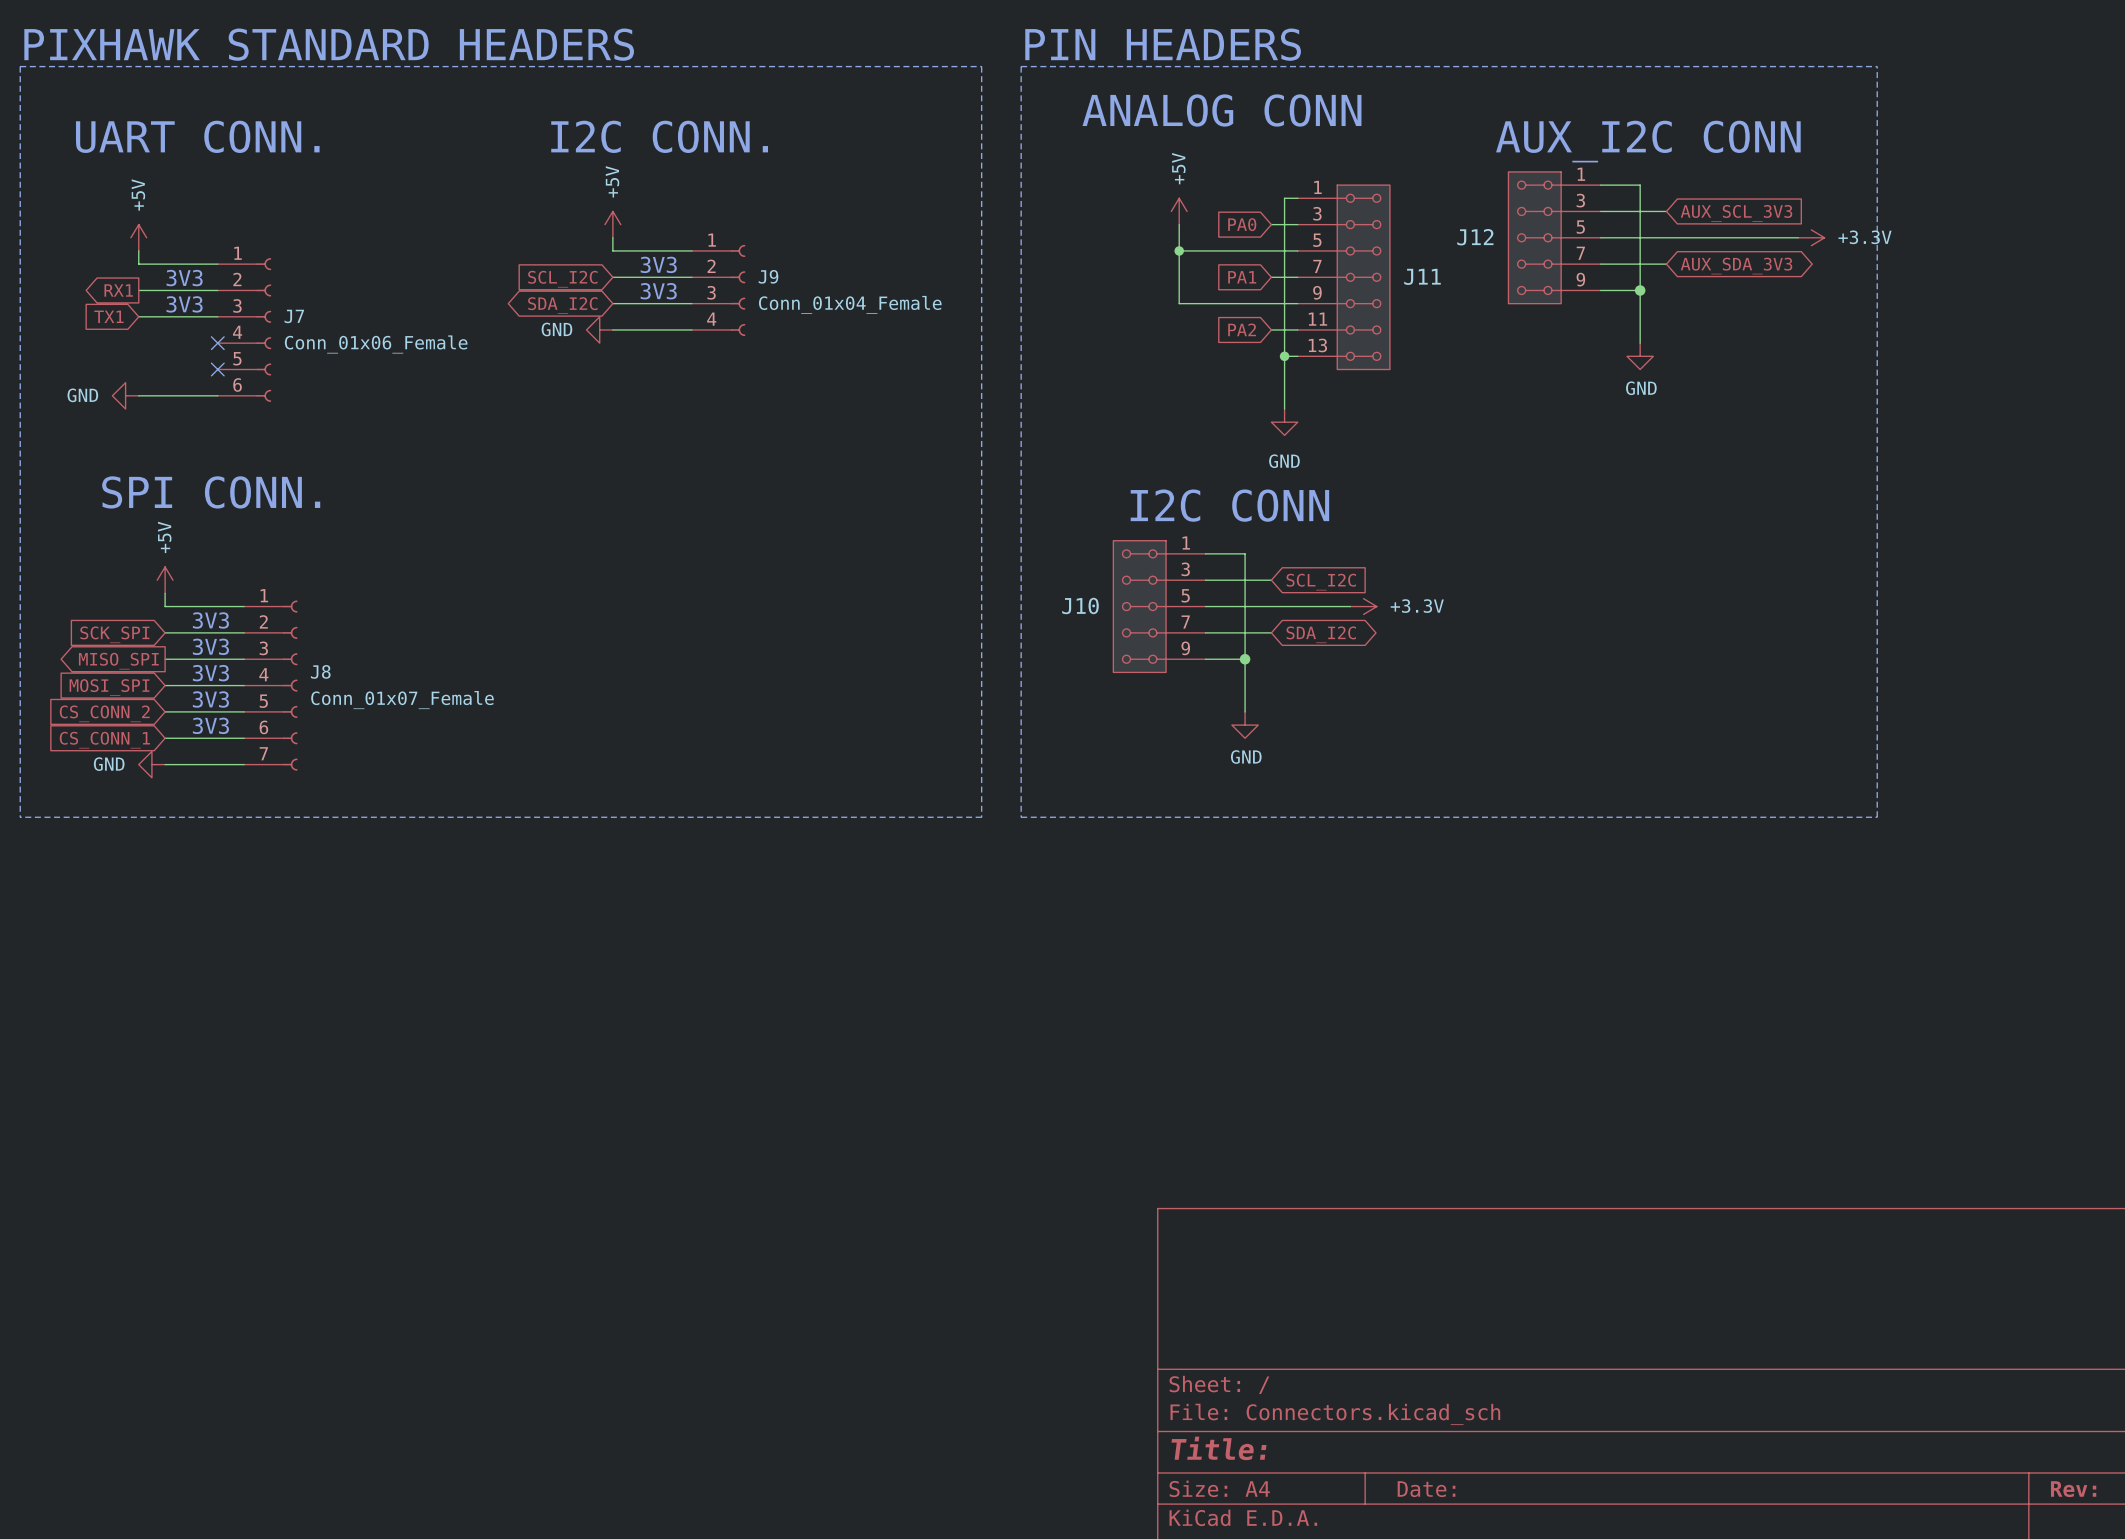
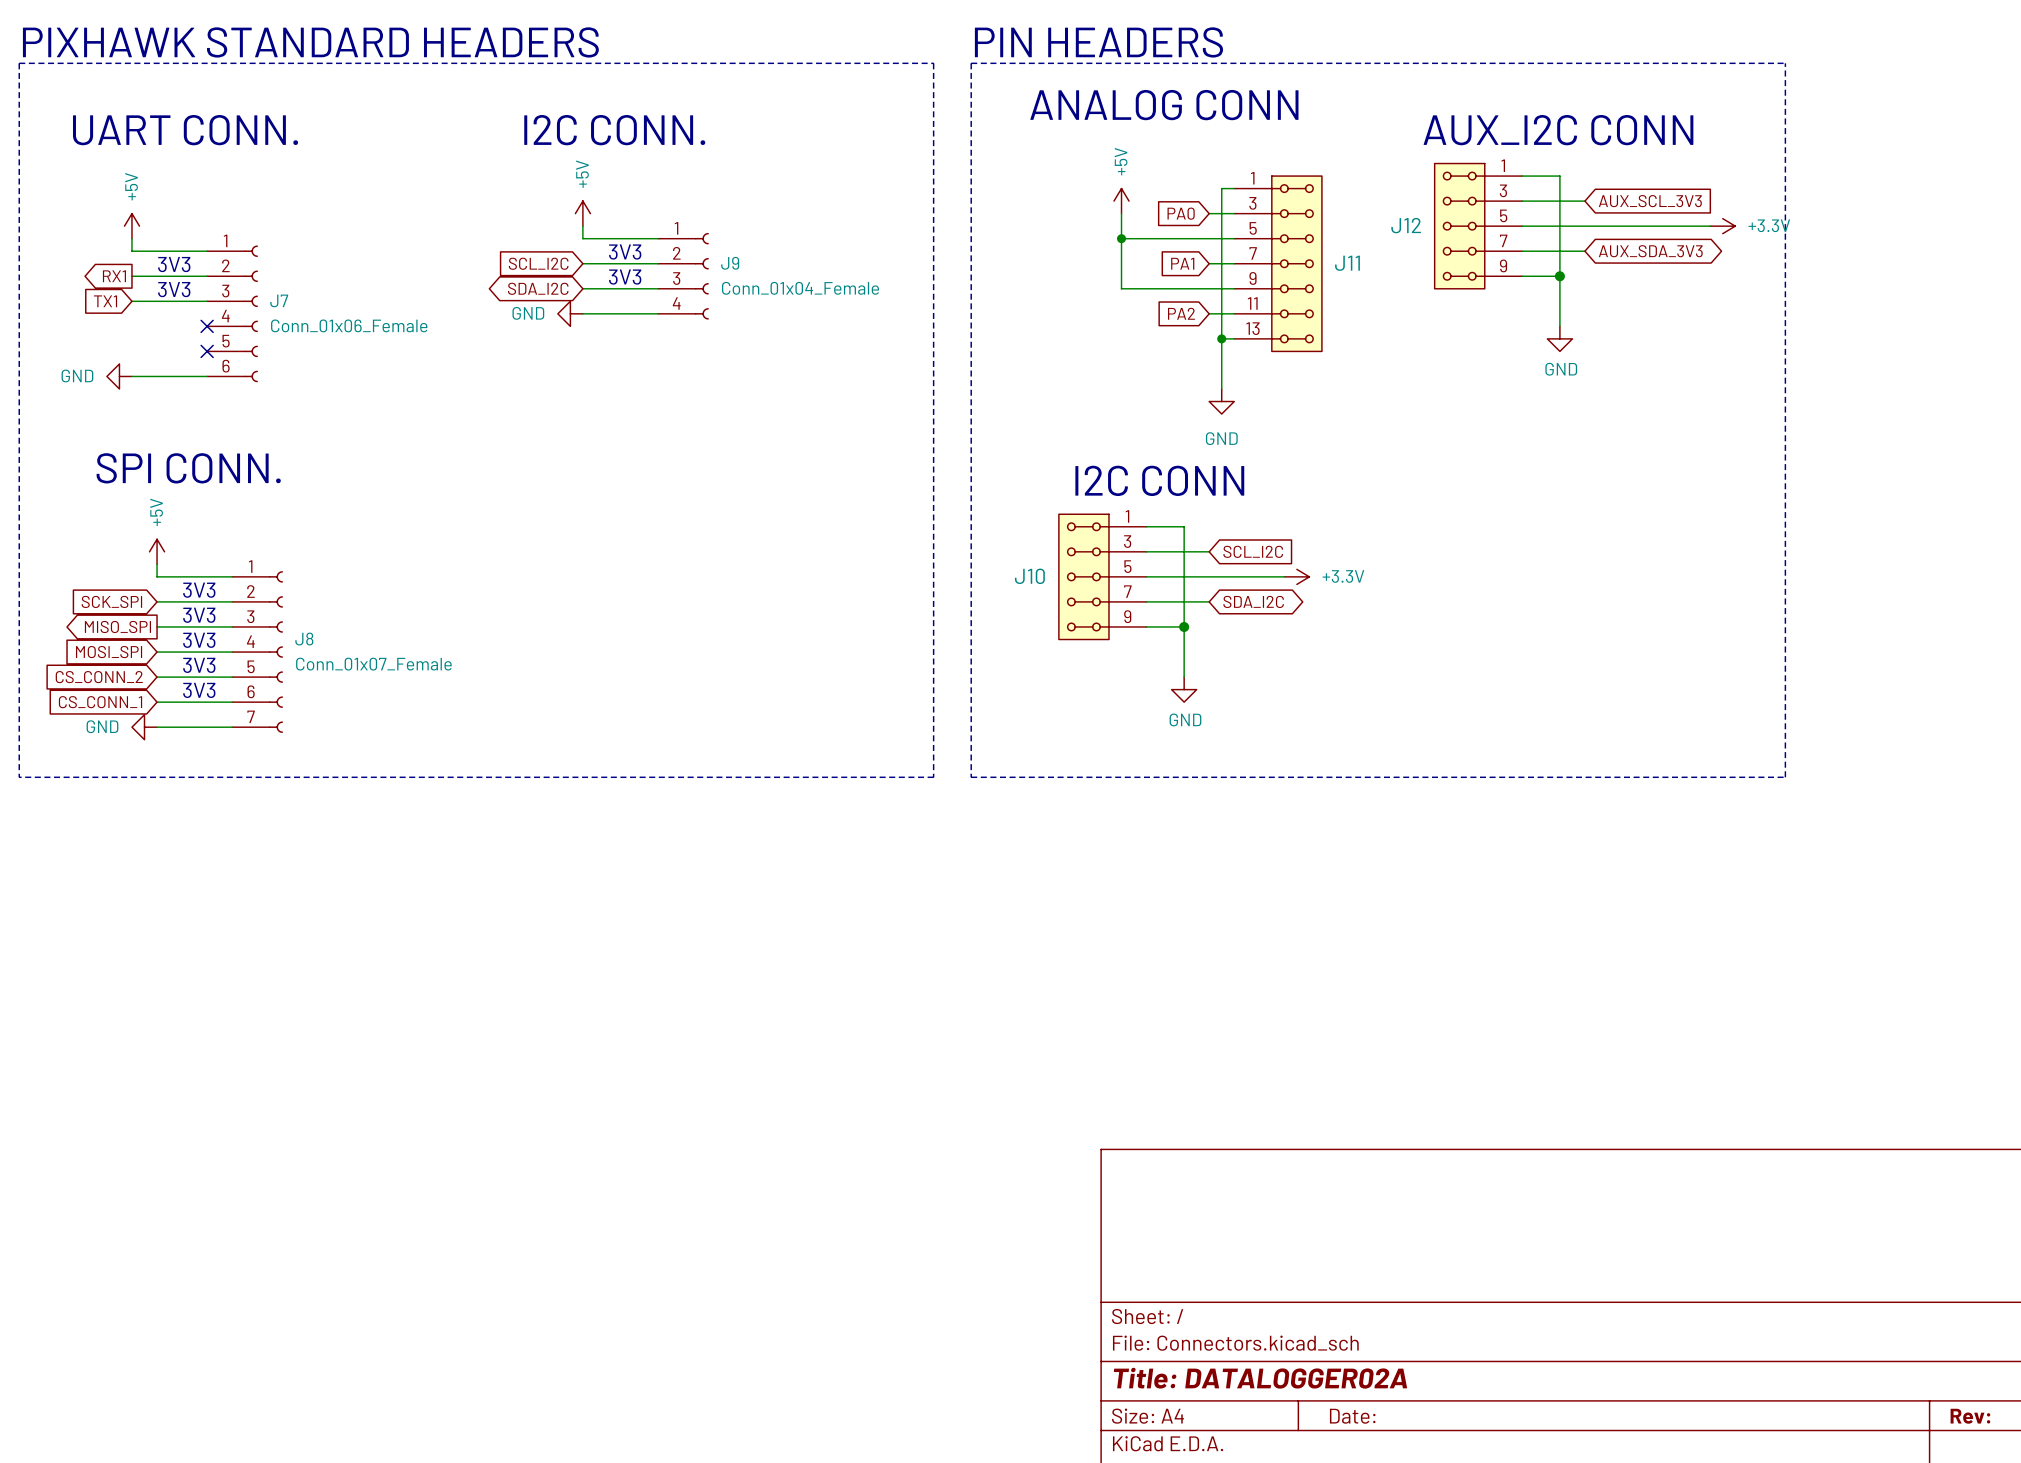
title block: Title: (1218, 1448) -> Title: DATALOGGER02A (1260, 1378)

